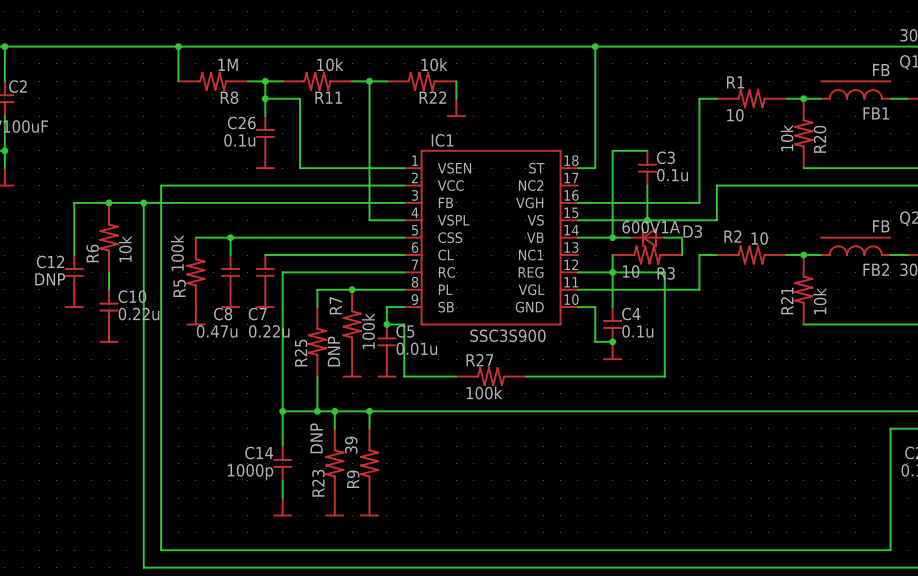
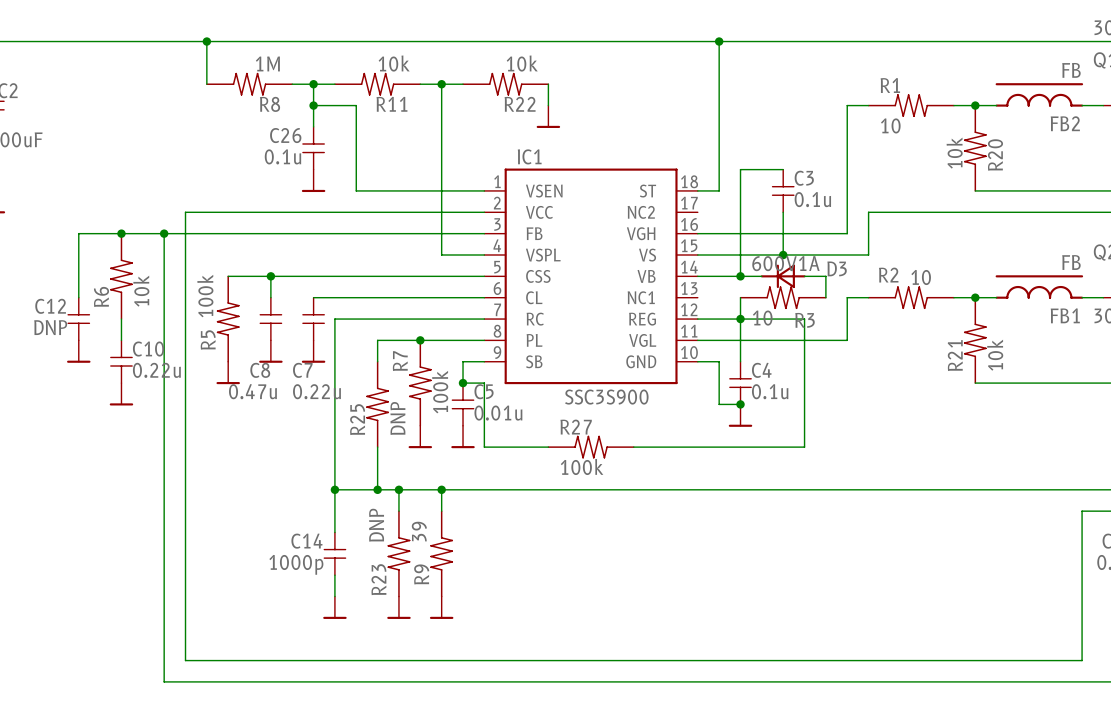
FB1 name: FB1 (876, 113) -> FB2 (1065, 123)
FB2 name: FB2 (876, 269) -> FB1 (1065, 315)

